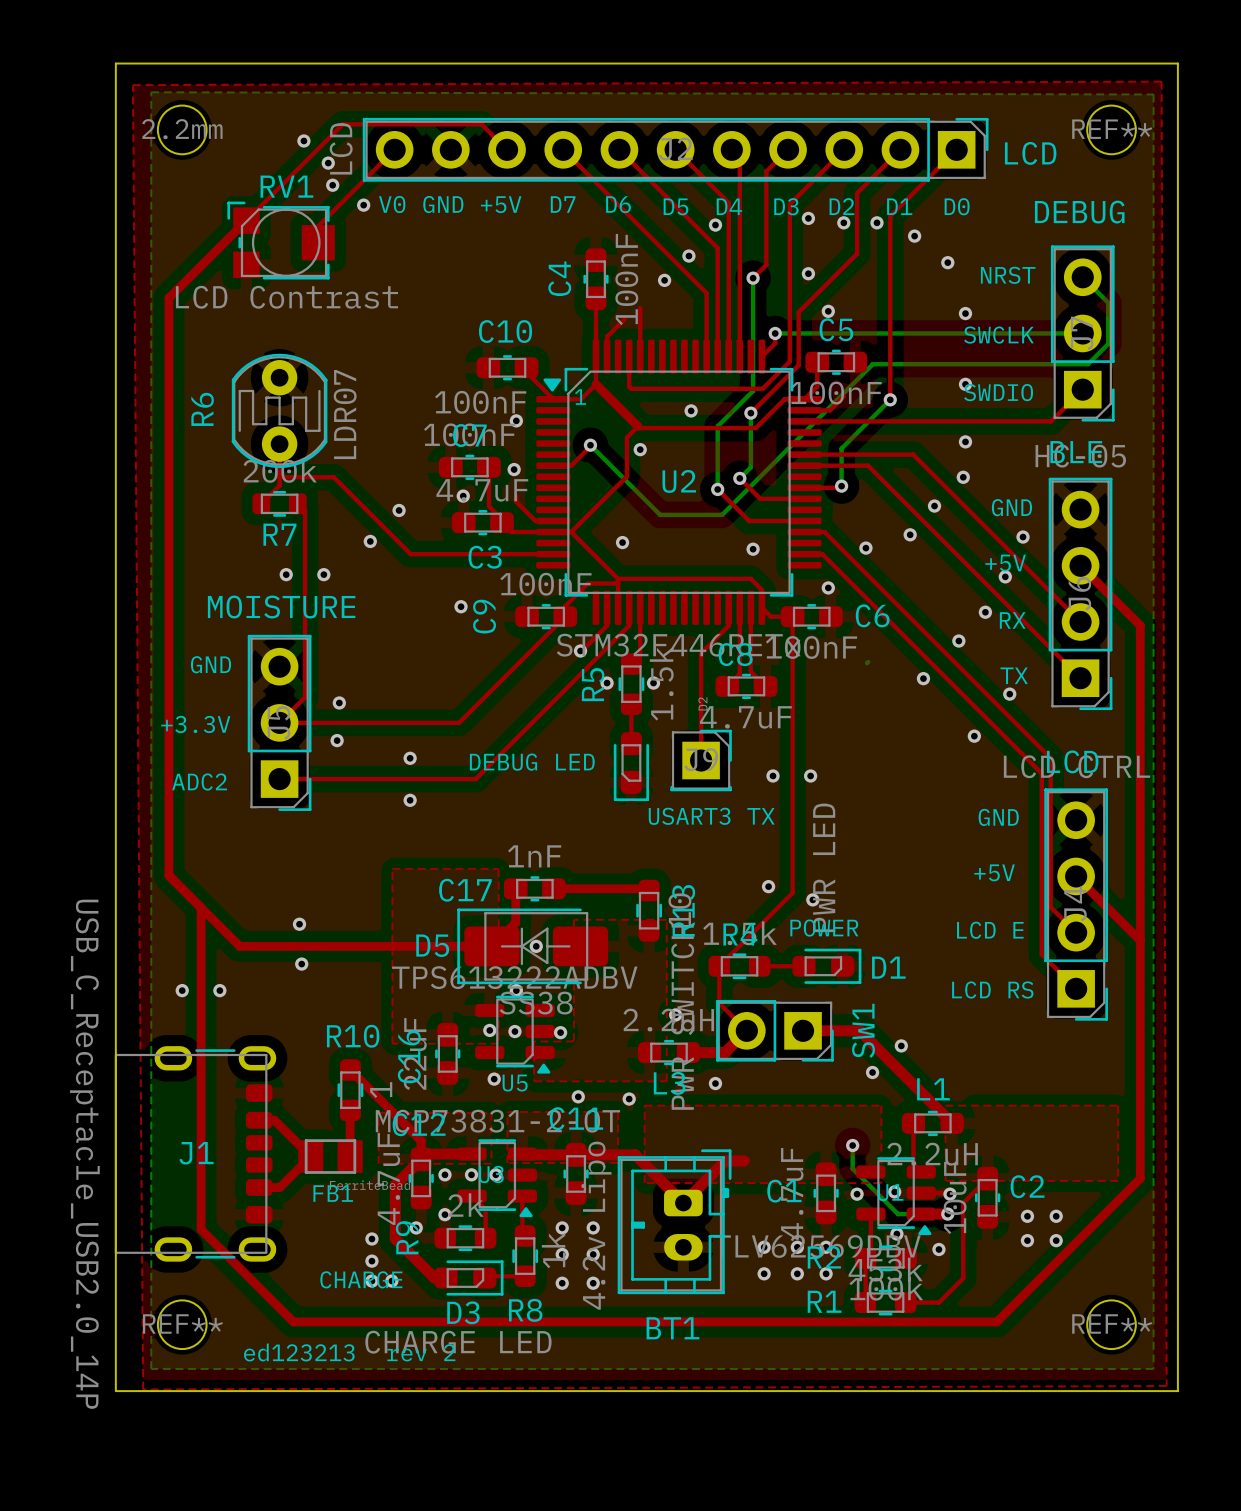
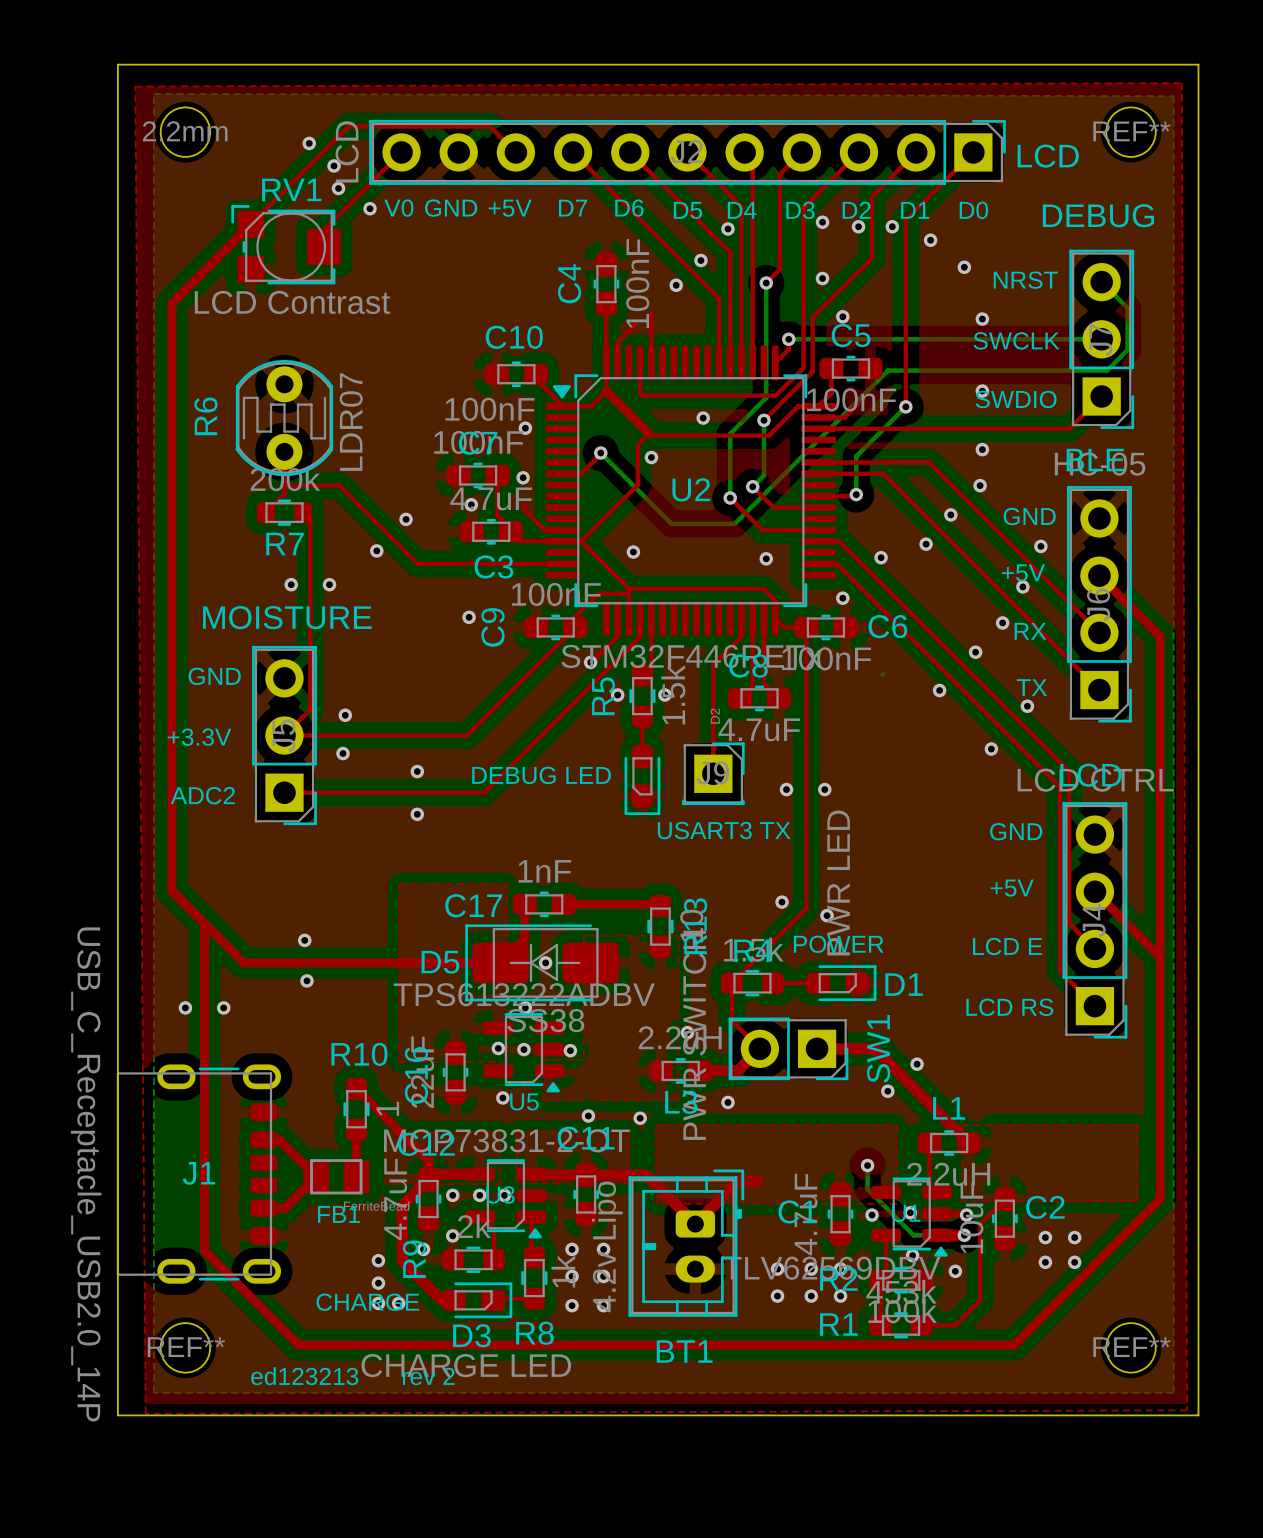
text: 1 (580, 397) -> none

